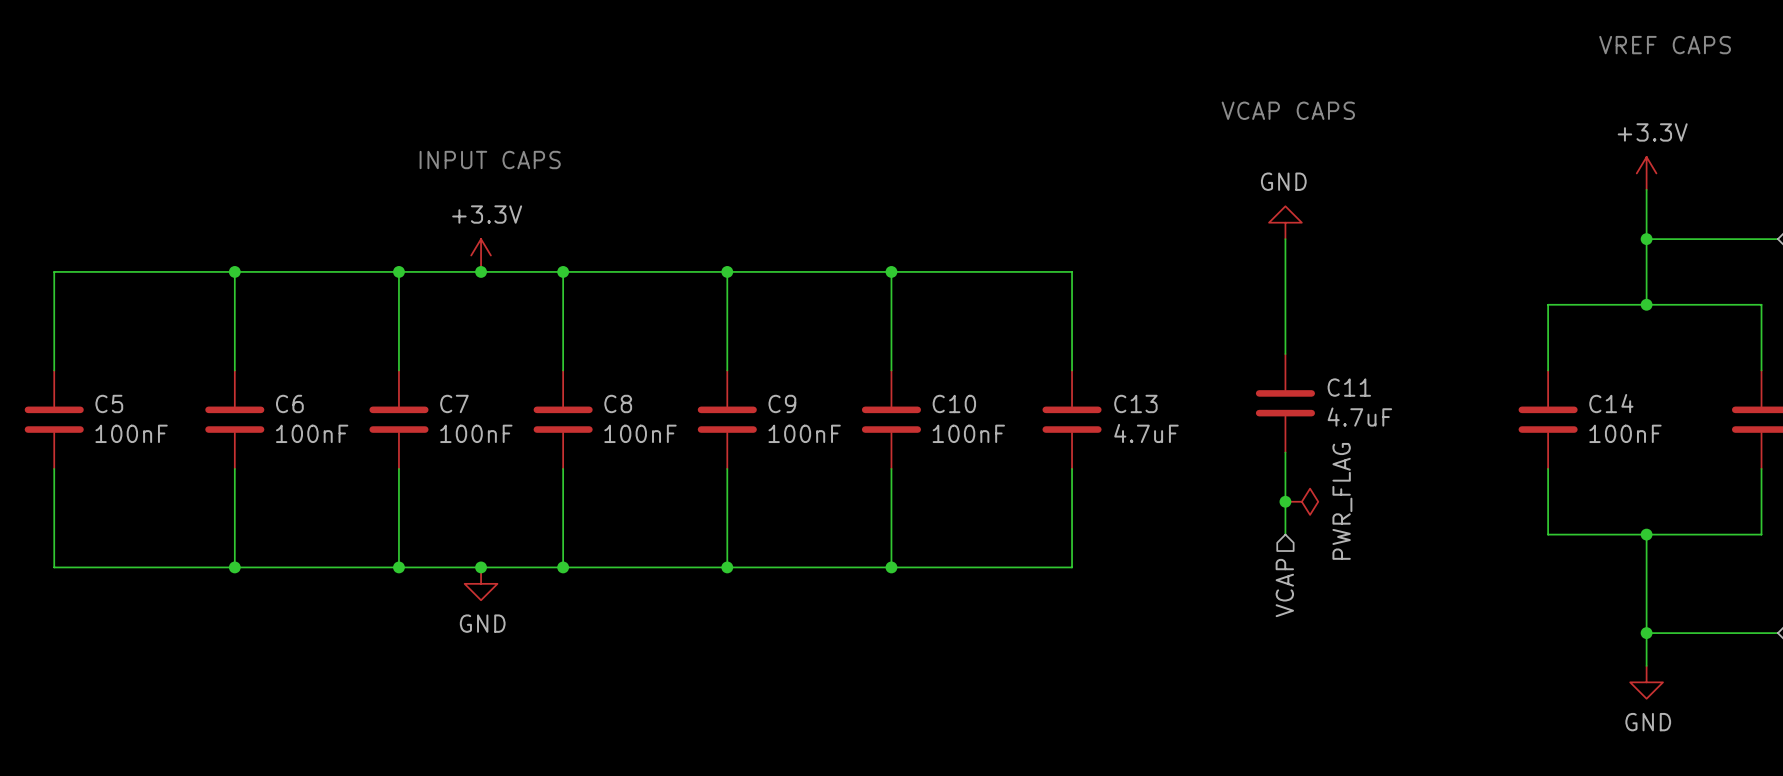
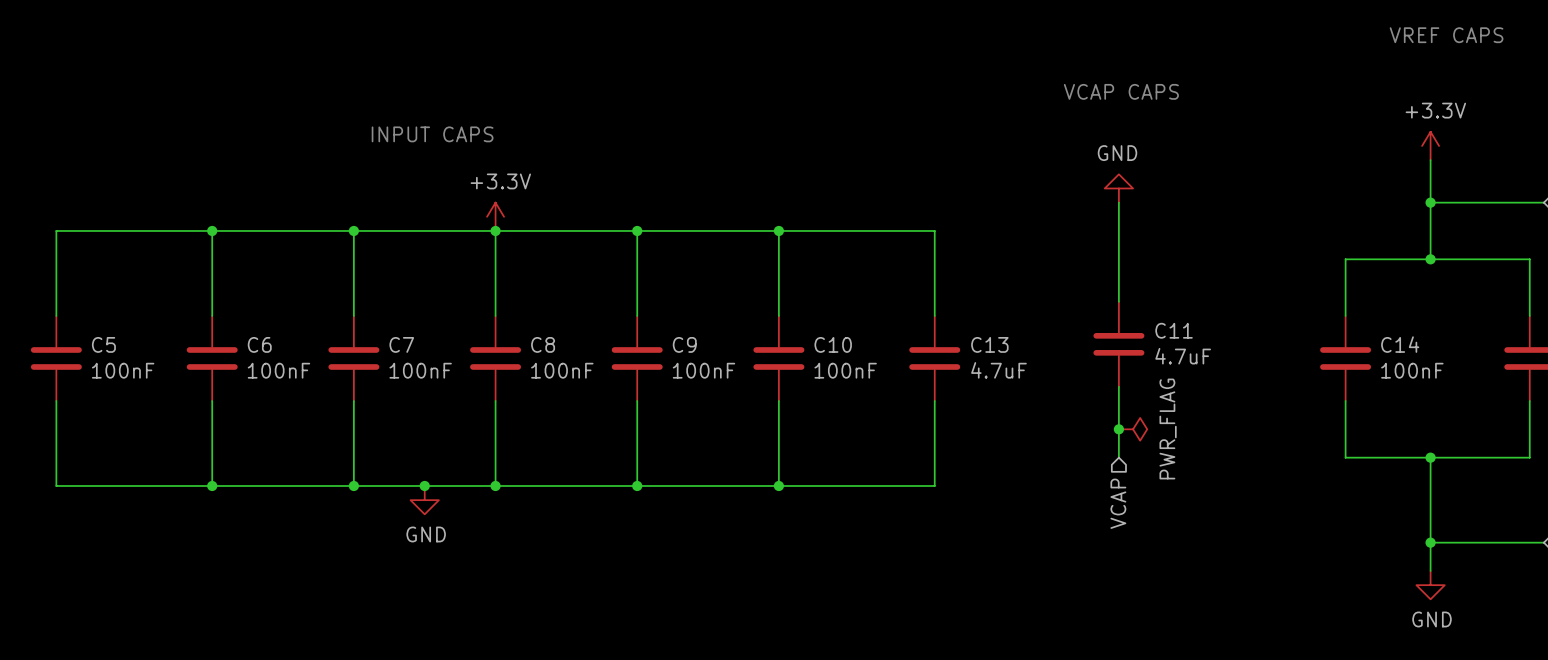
power symbol position: +3.3V (481, 255) -> +3.3V (495, 216)
junction: (481, 271) -> none

